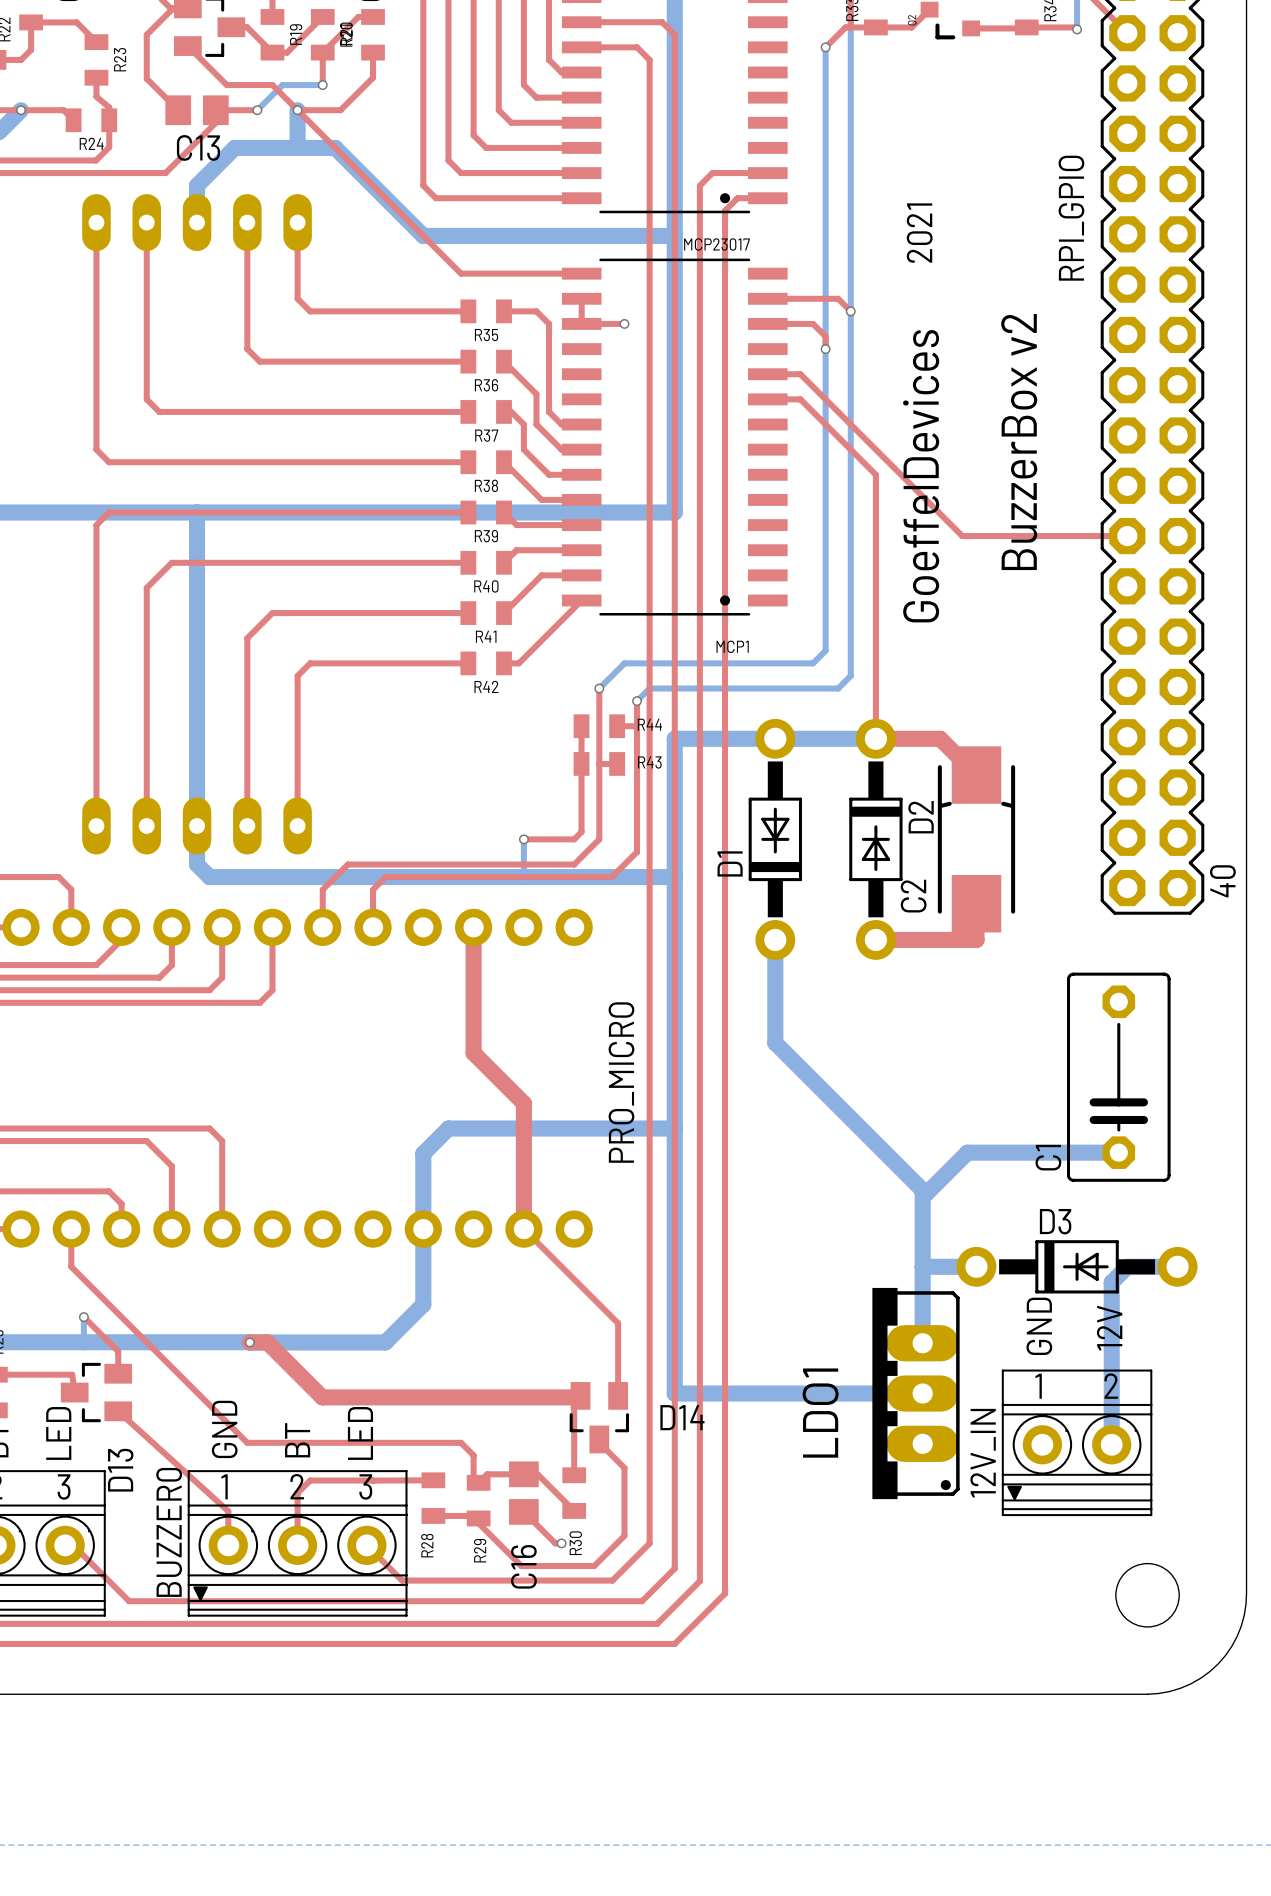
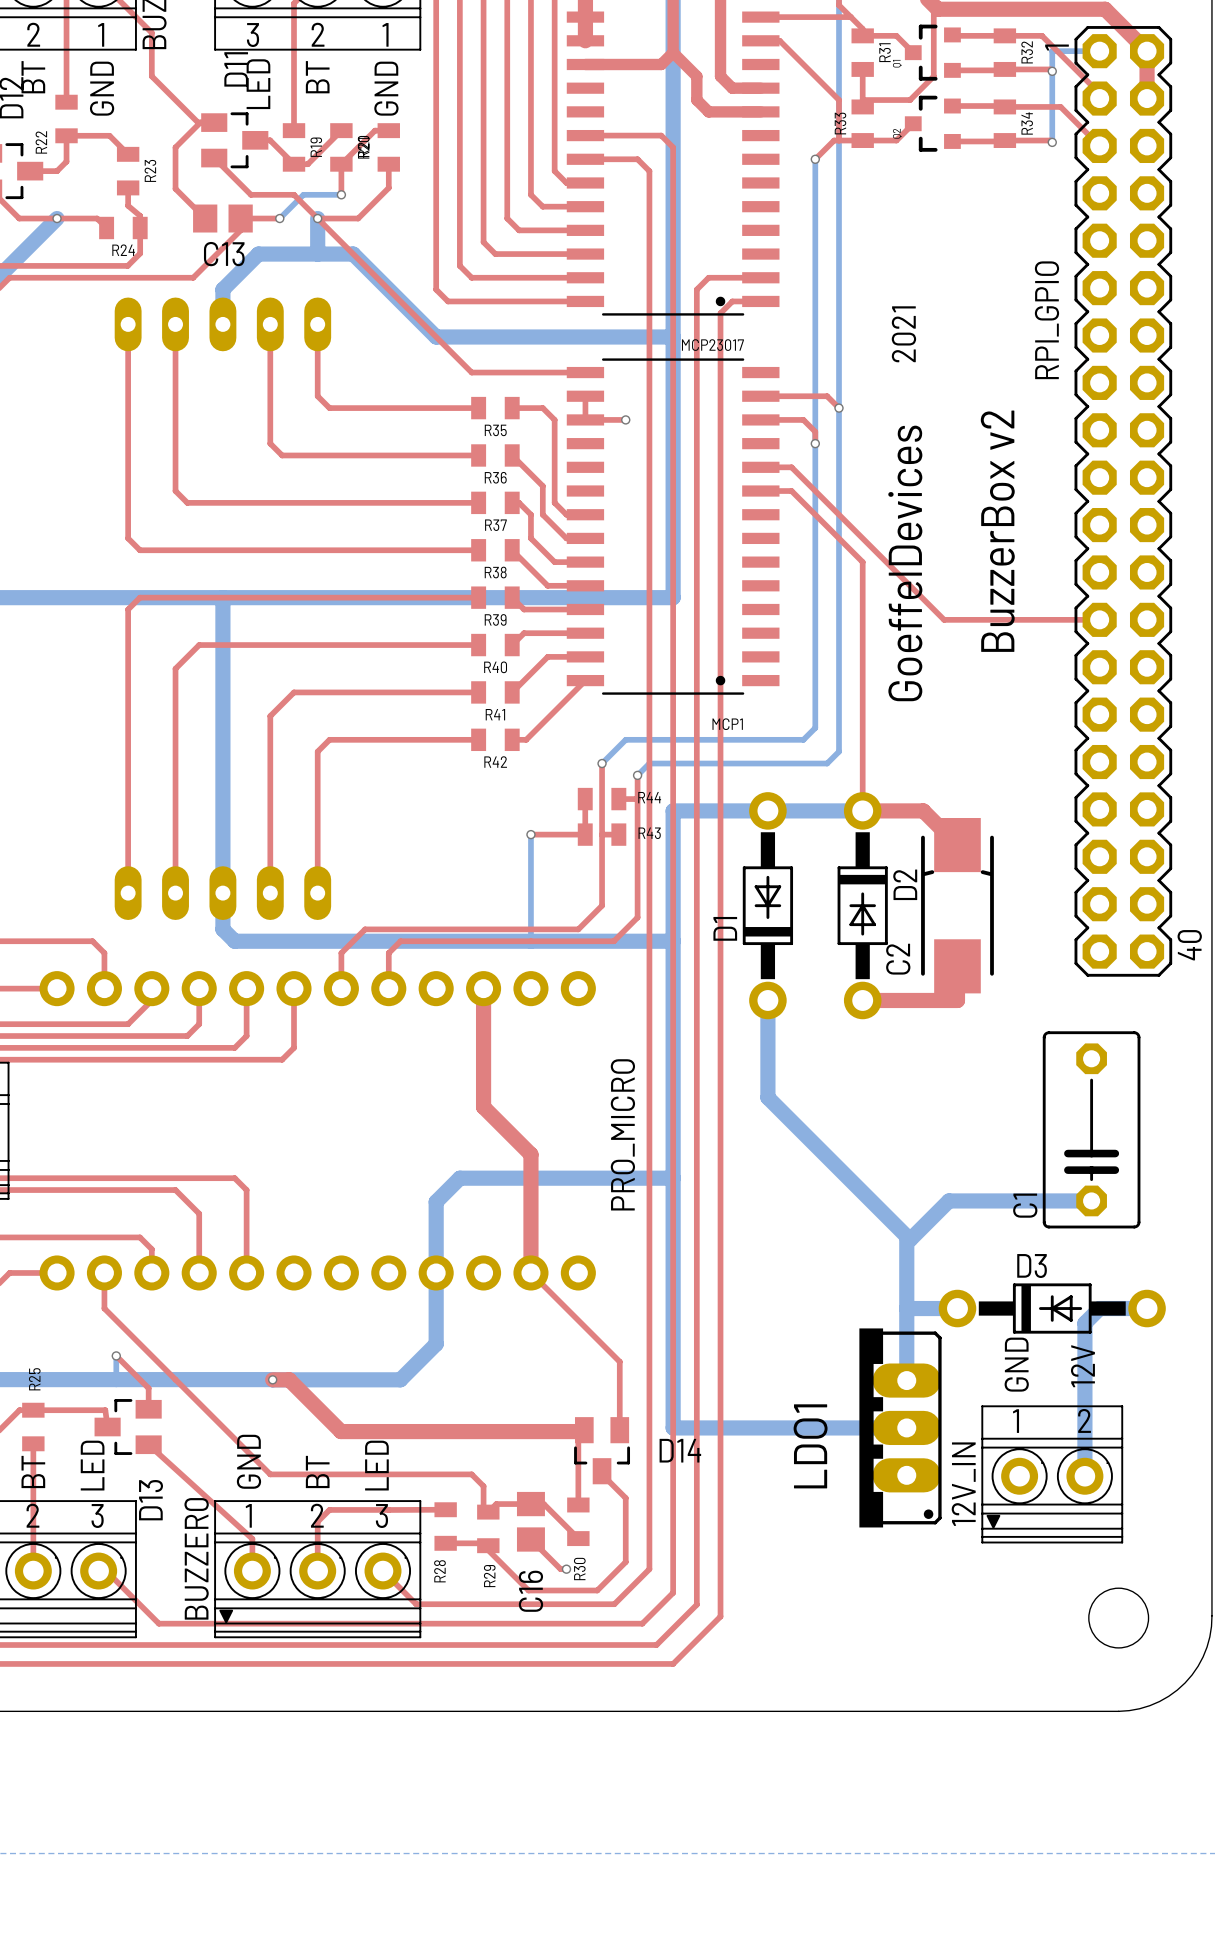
bottom track: none -> (530, 834) (530, 905)
top track: (581, 763) (581, 832) (574, 839) (523, 839) -> (585, 834) (530, 834)
via position: (523, 839) -> (530, 834)

